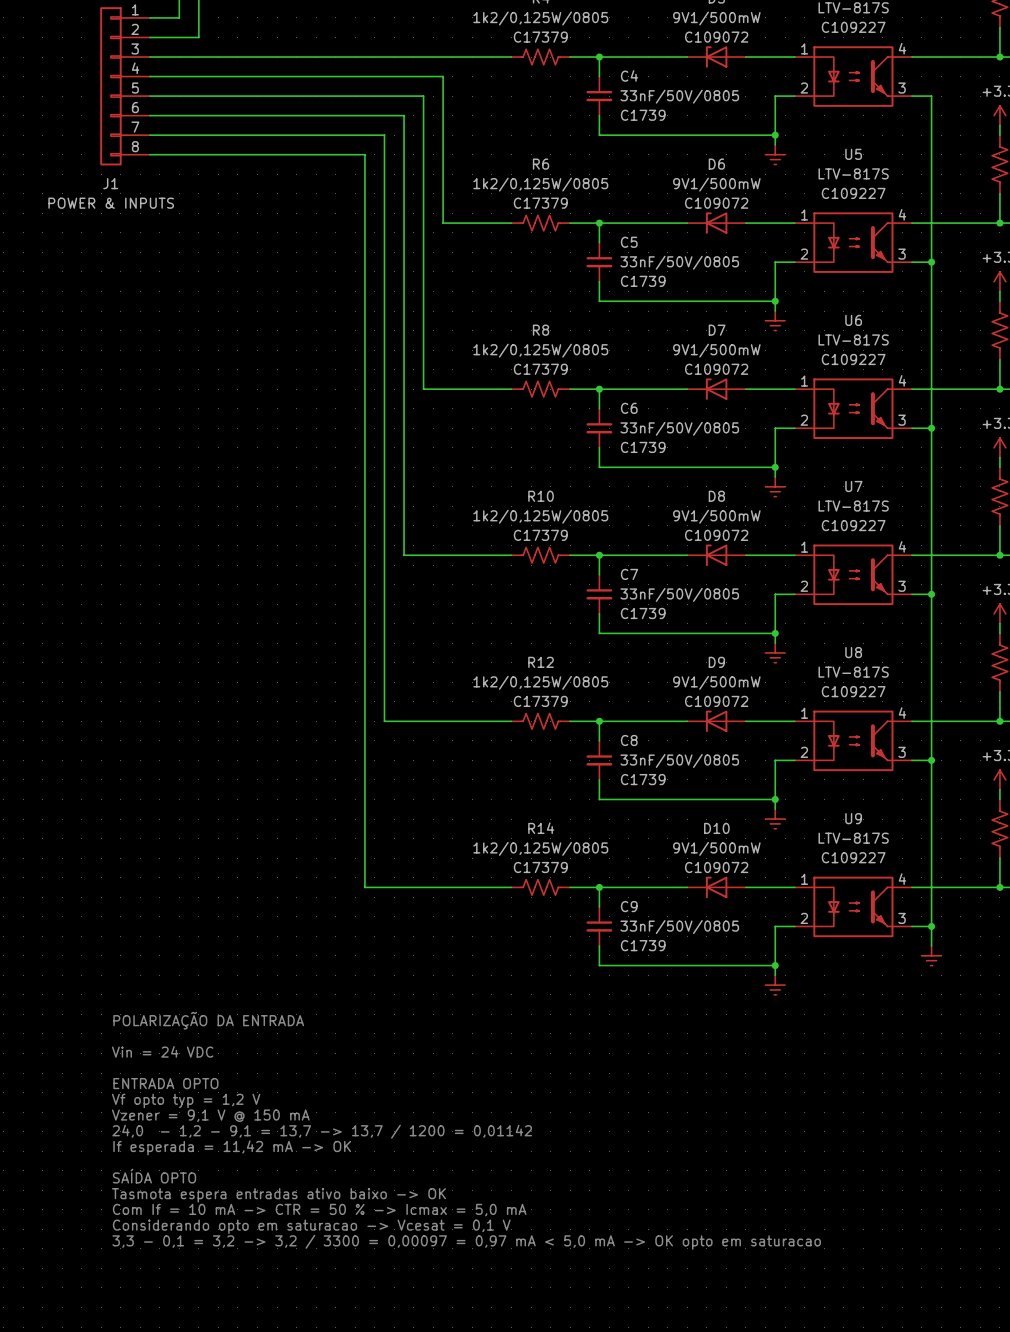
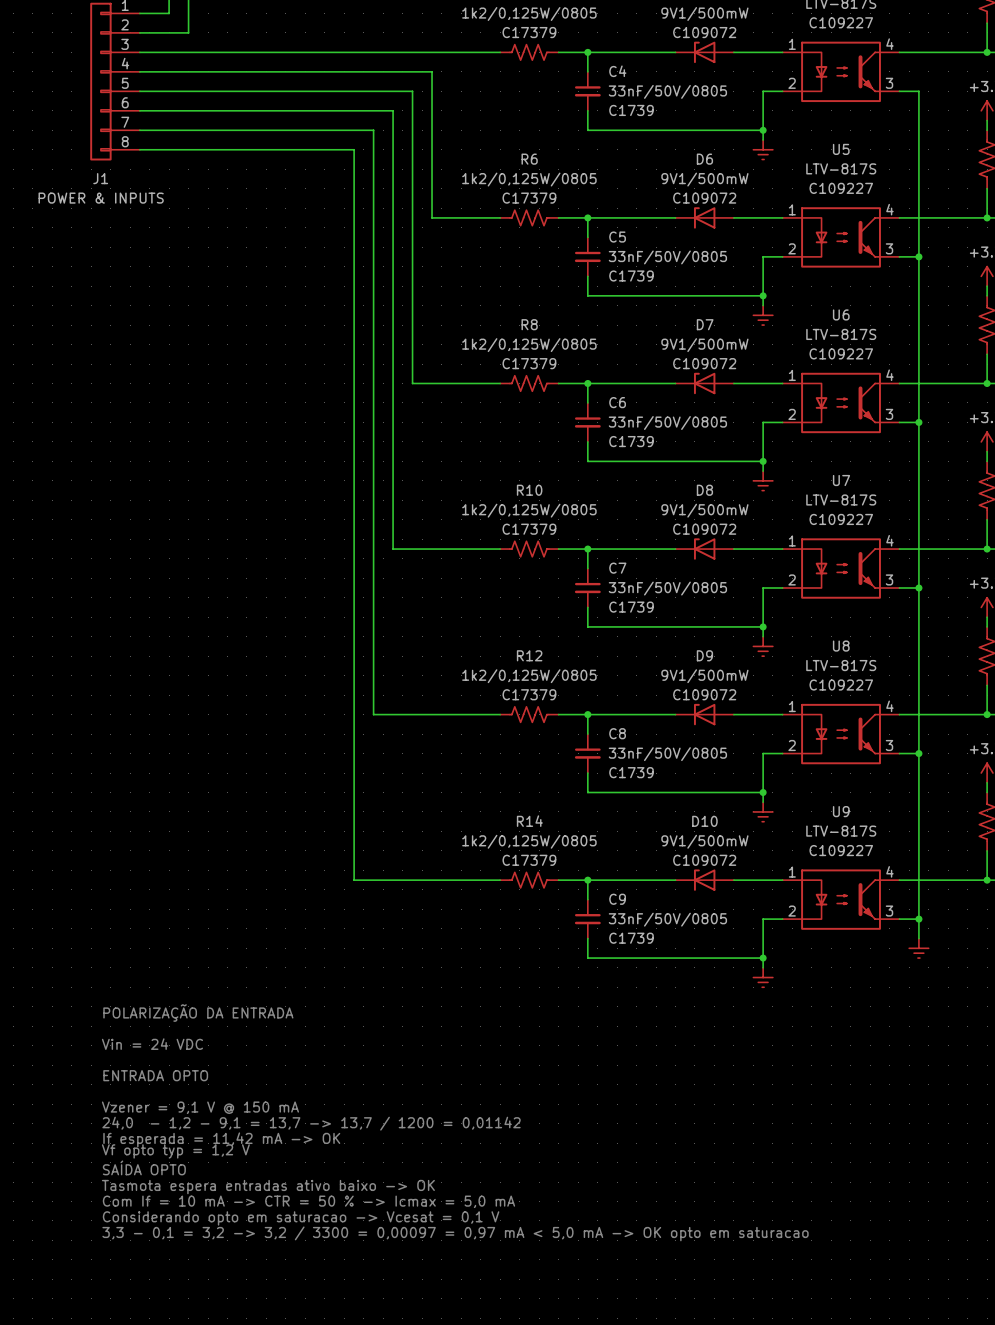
text position: Vf opto typ = 1,2 V (186, 1100) -> Vf opto typ = 1,2 V (175, 1151)

